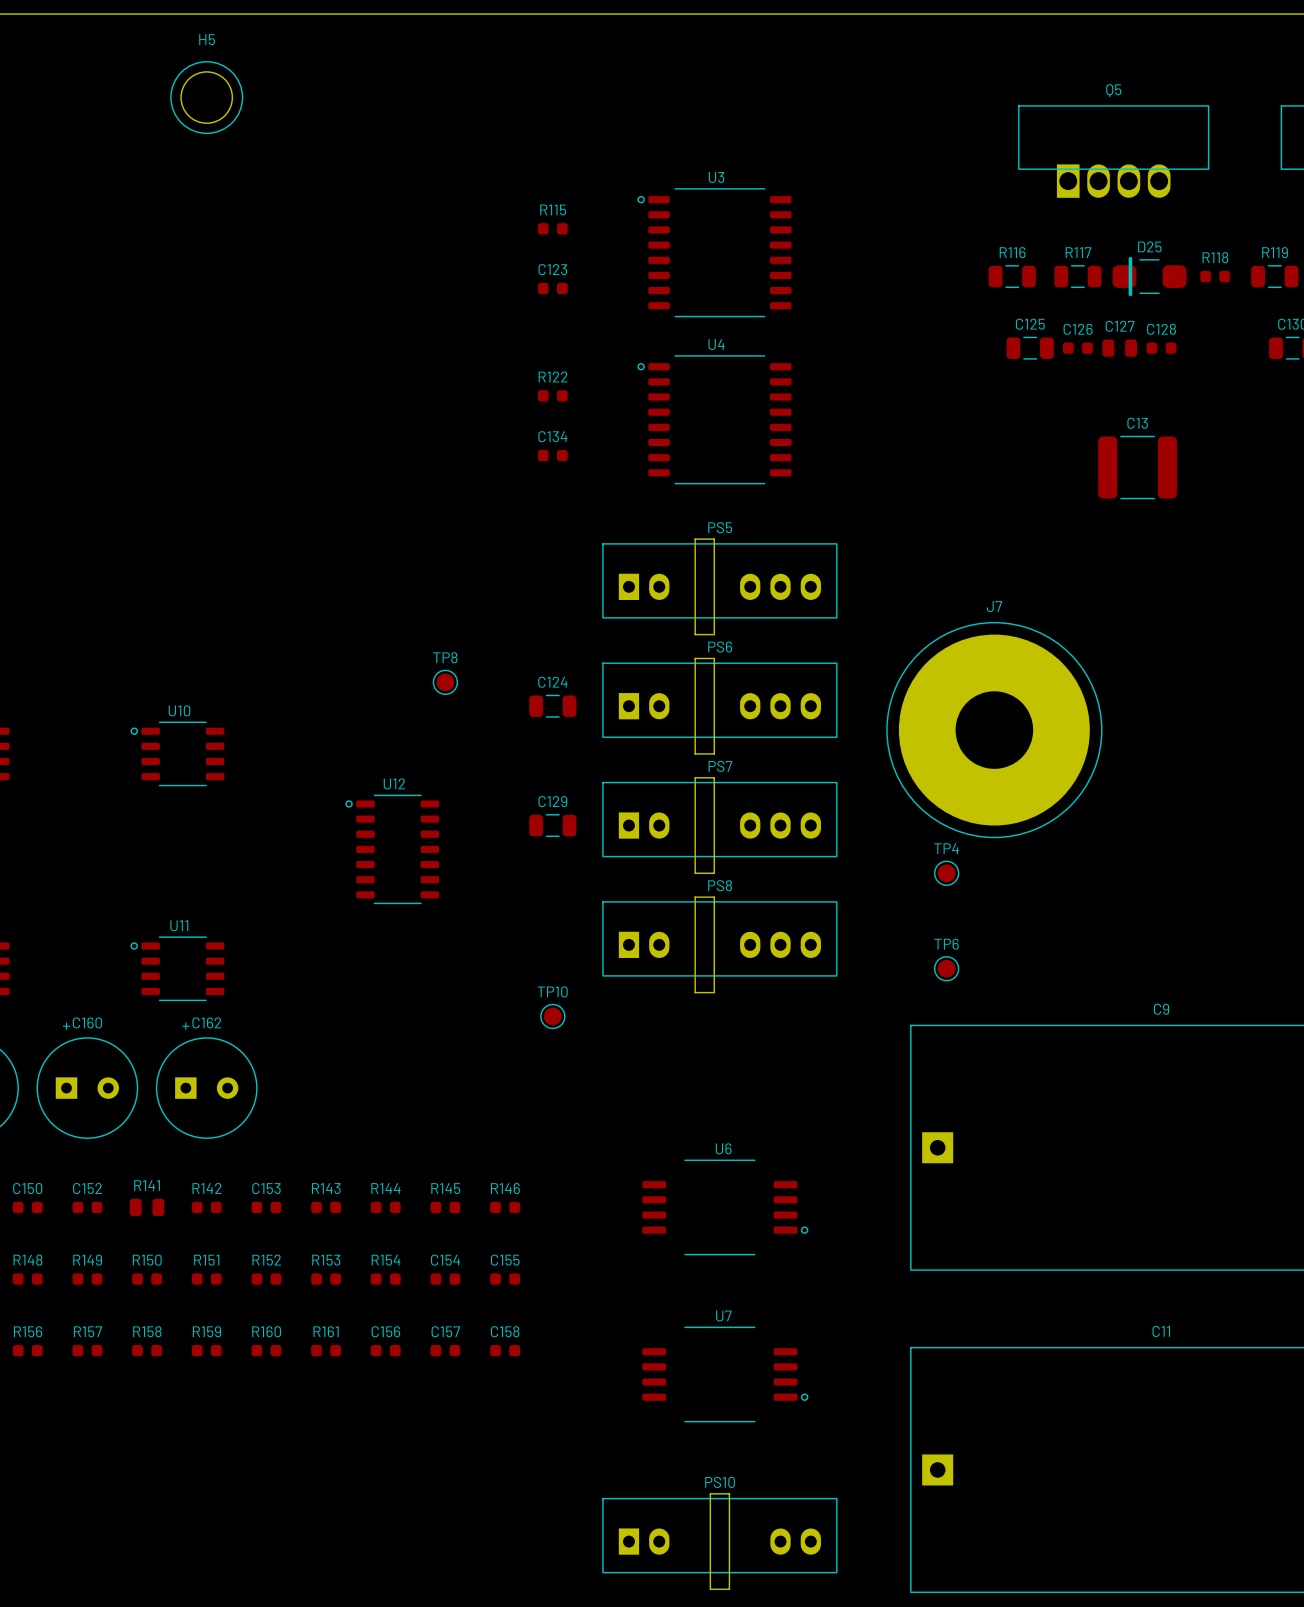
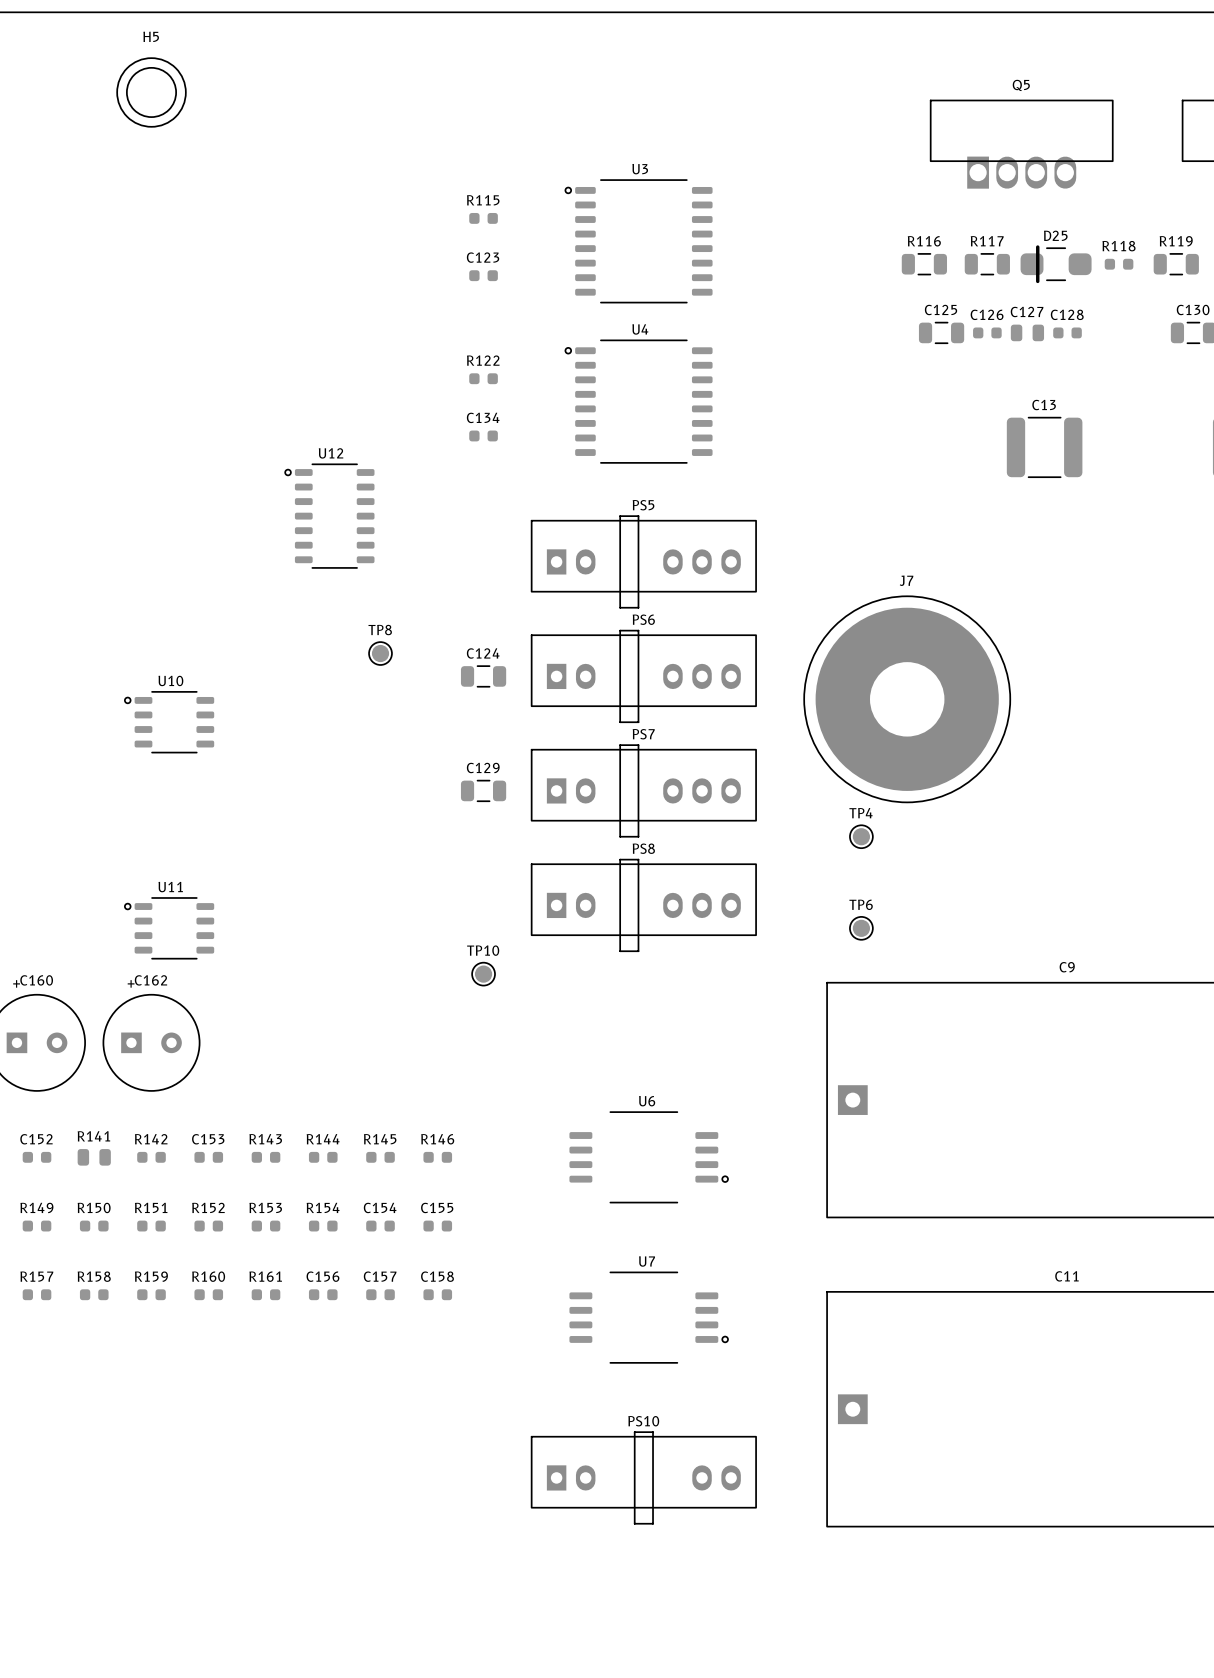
U10 position: (177, 753) -> (169, 722)
U12 position: (392, 849) -> (329, 516)
U11 position: (177, 968) -> (169, 928)

